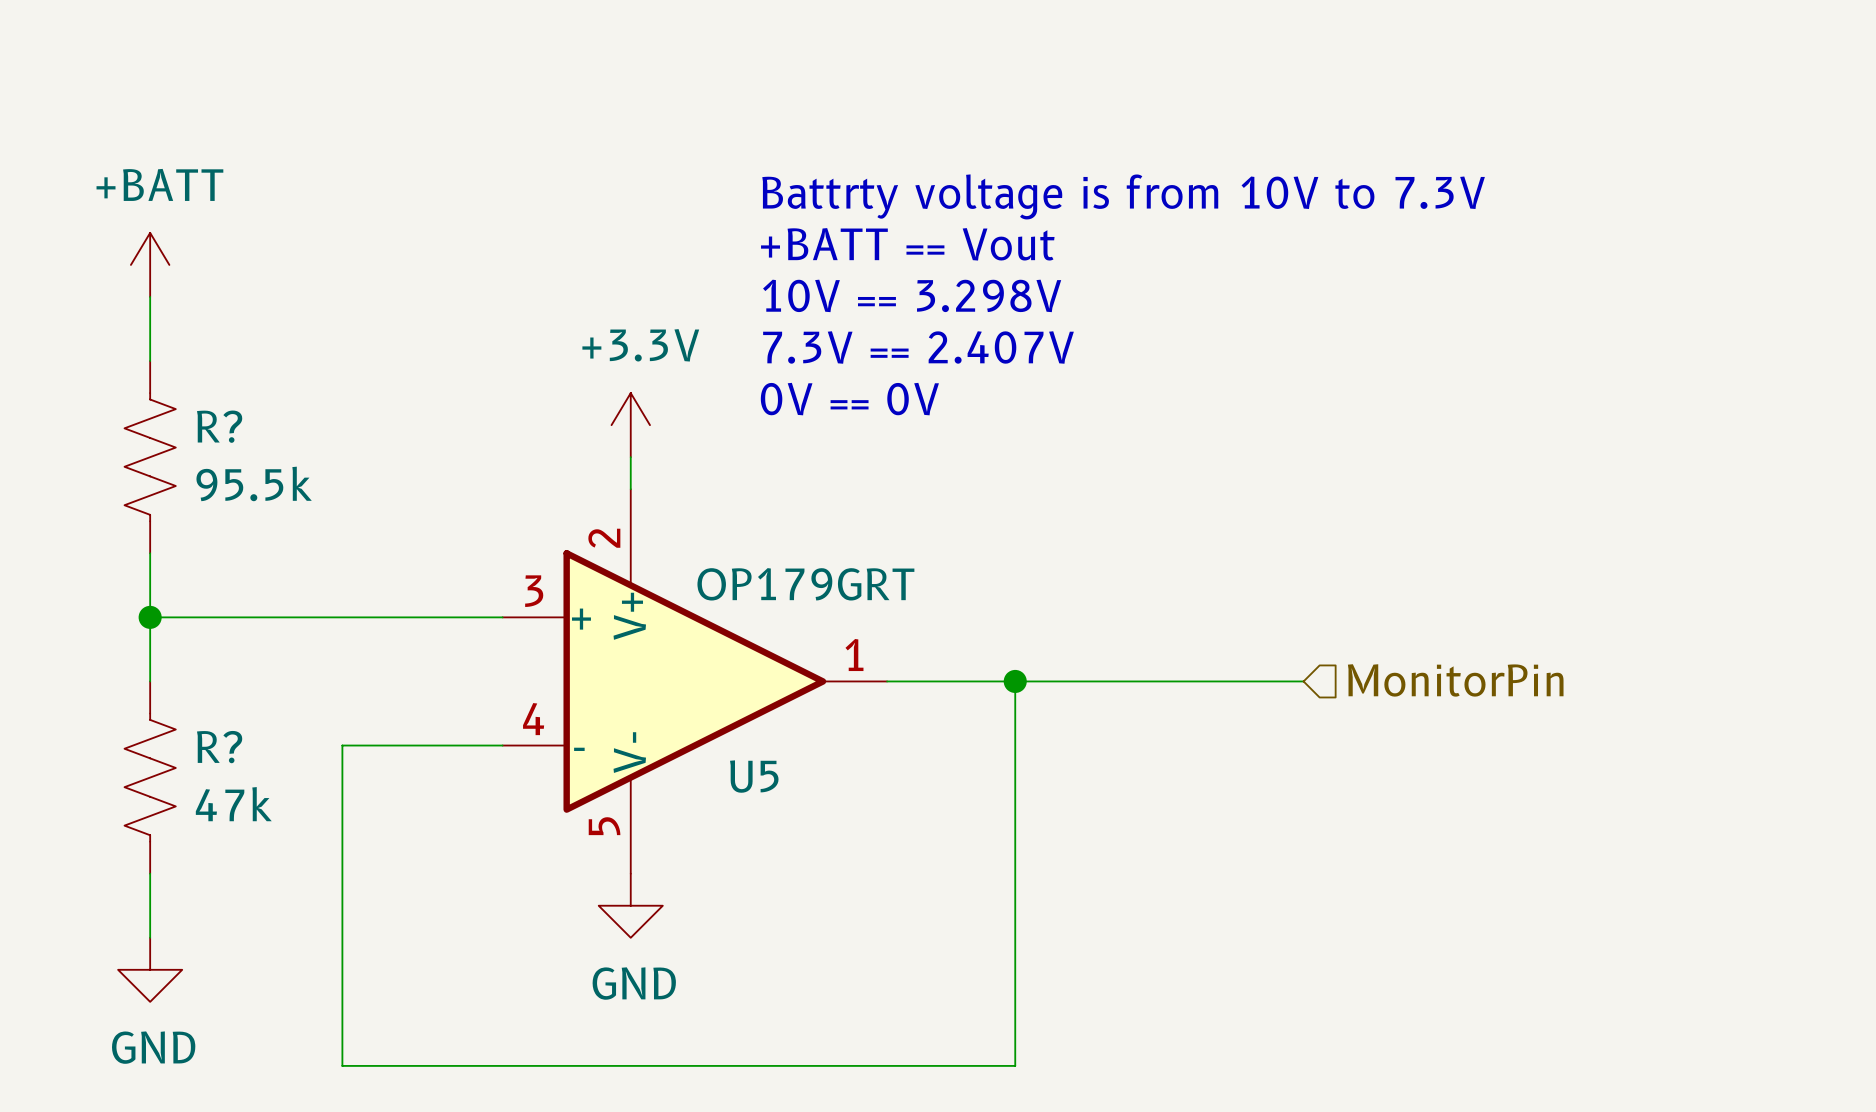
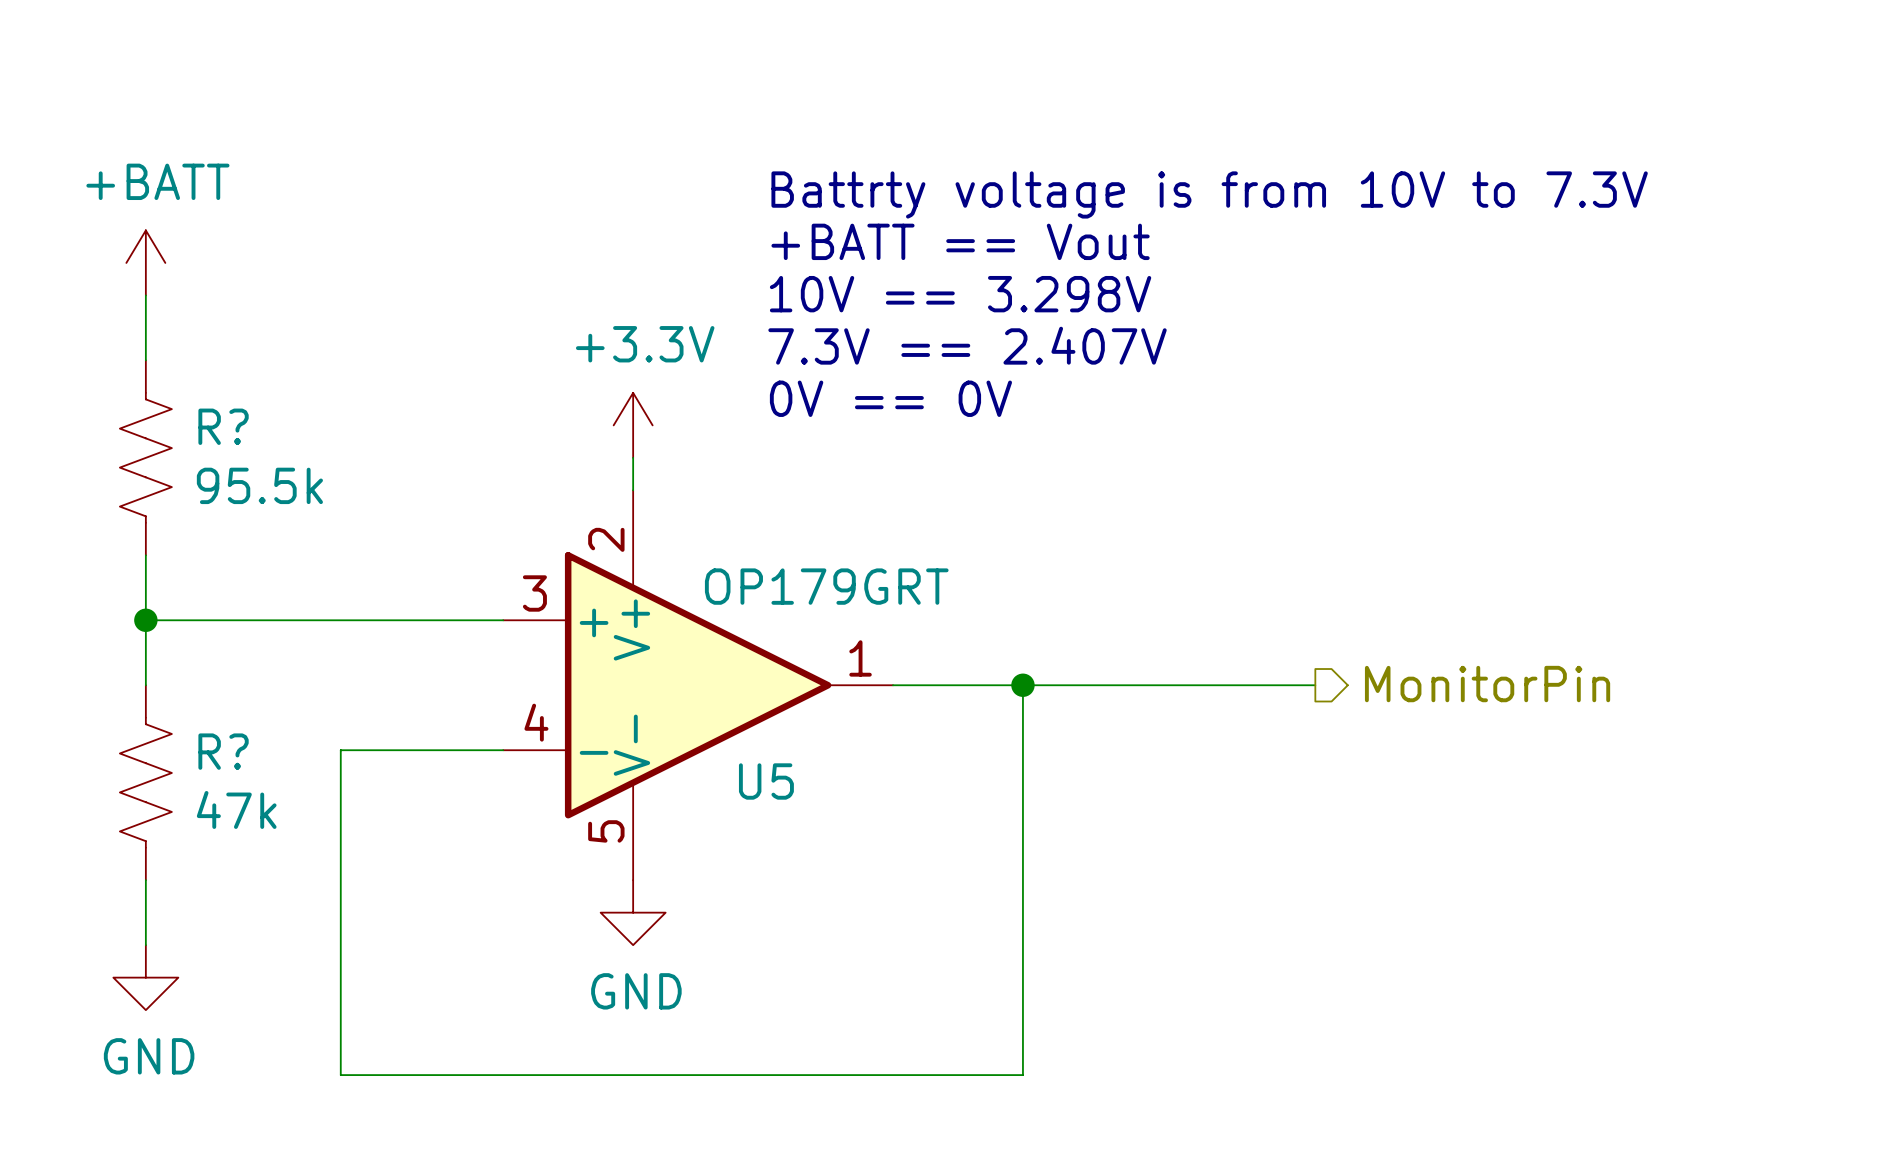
hierarchical label shape: input (1455, 680) -> output (1487, 684)

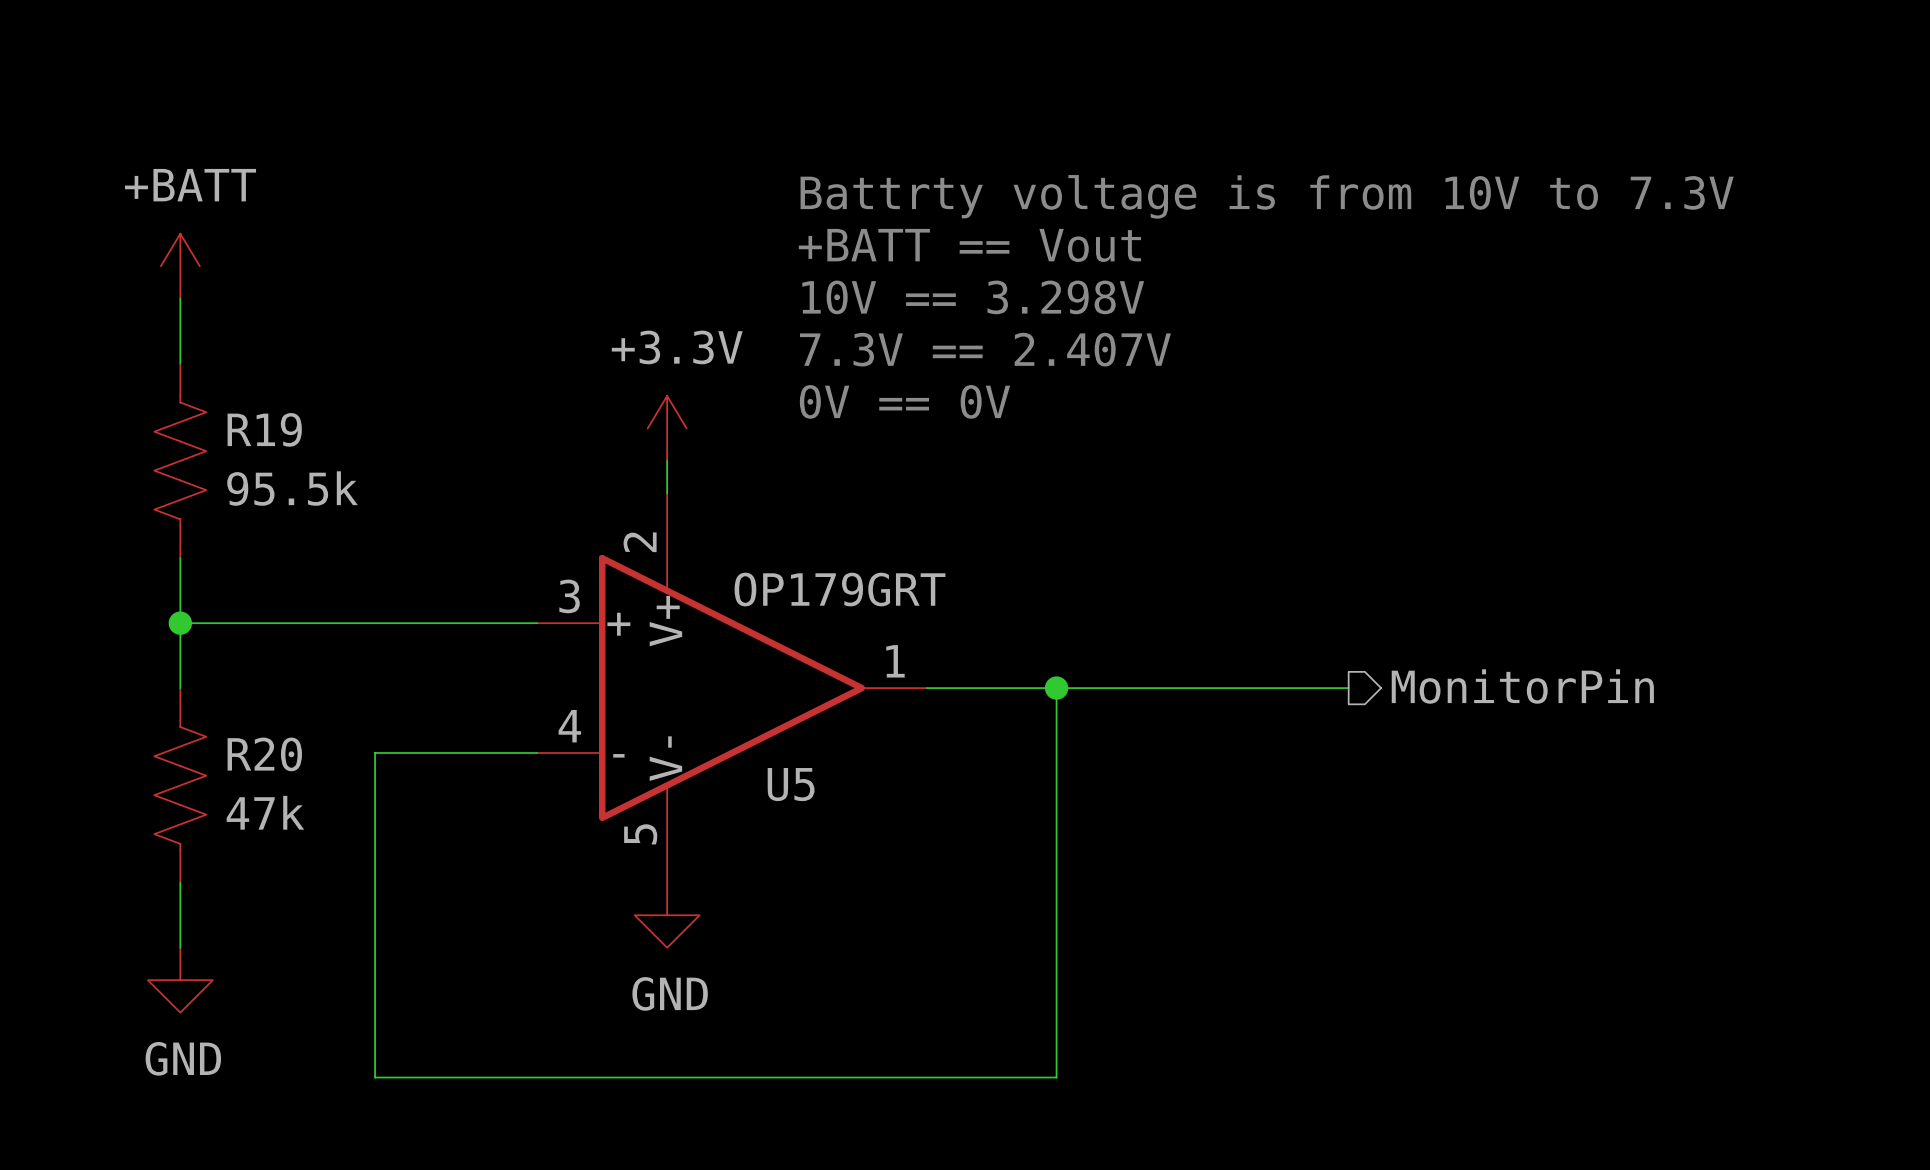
R? name: R? (223, 426) -> R19 (264, 429)
R? name: R? (223, 751) -> R20 (264, 754)

